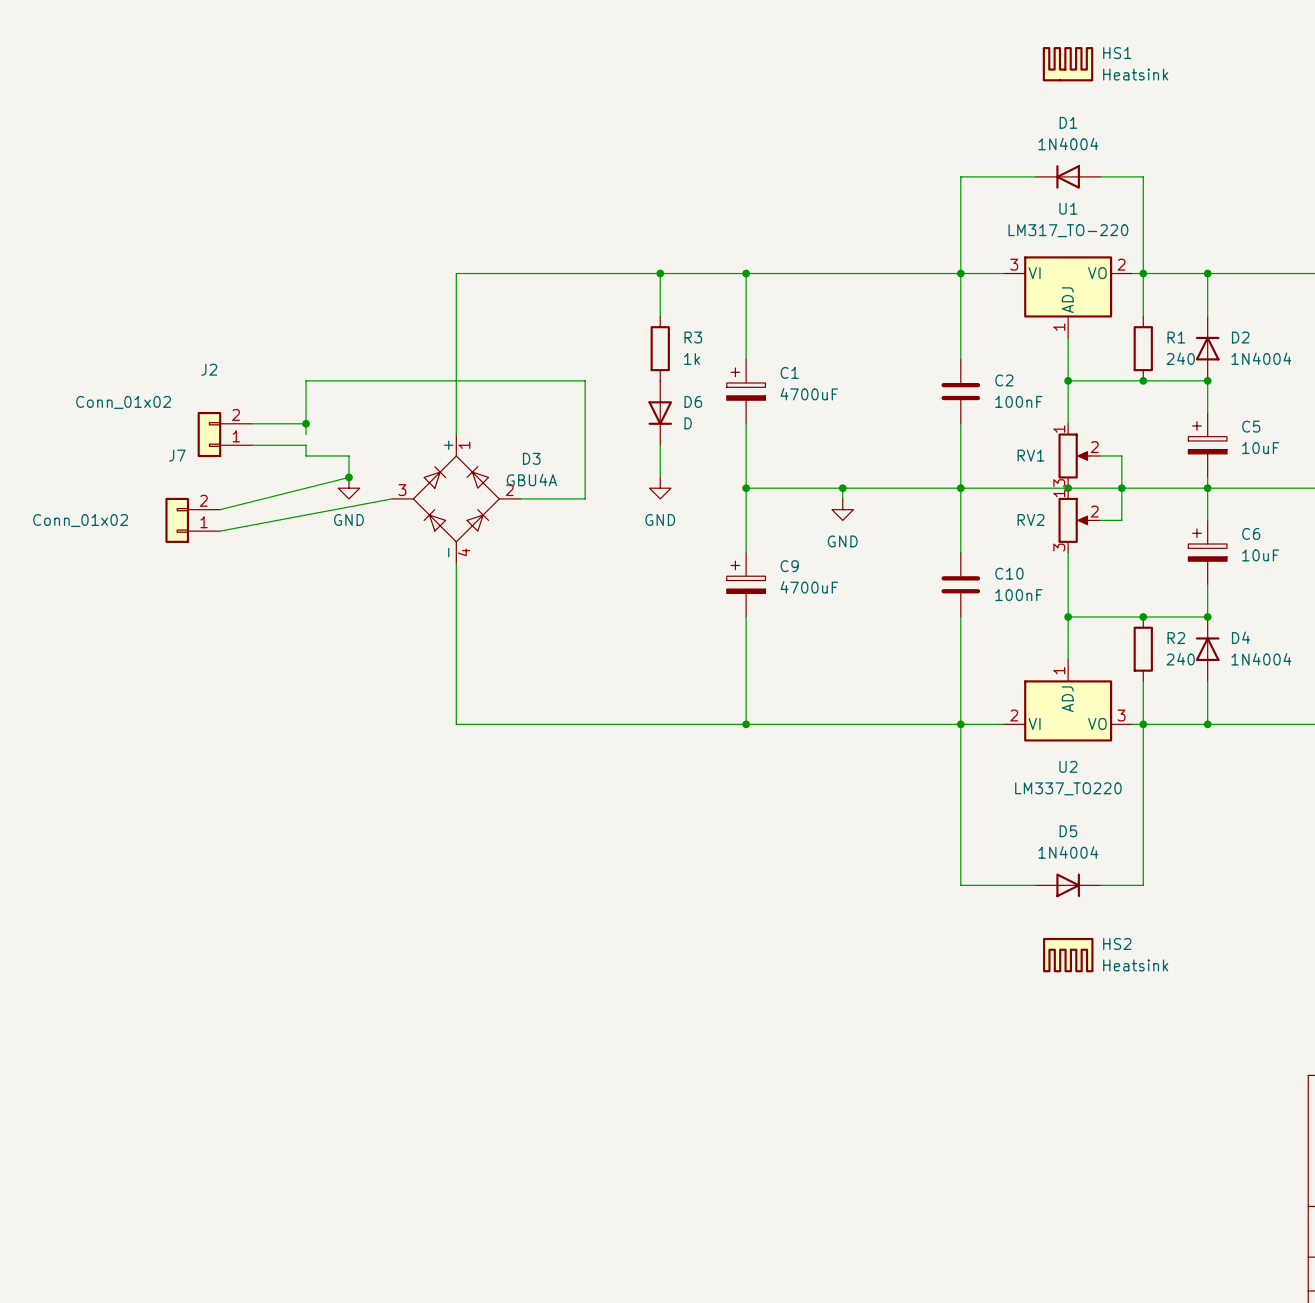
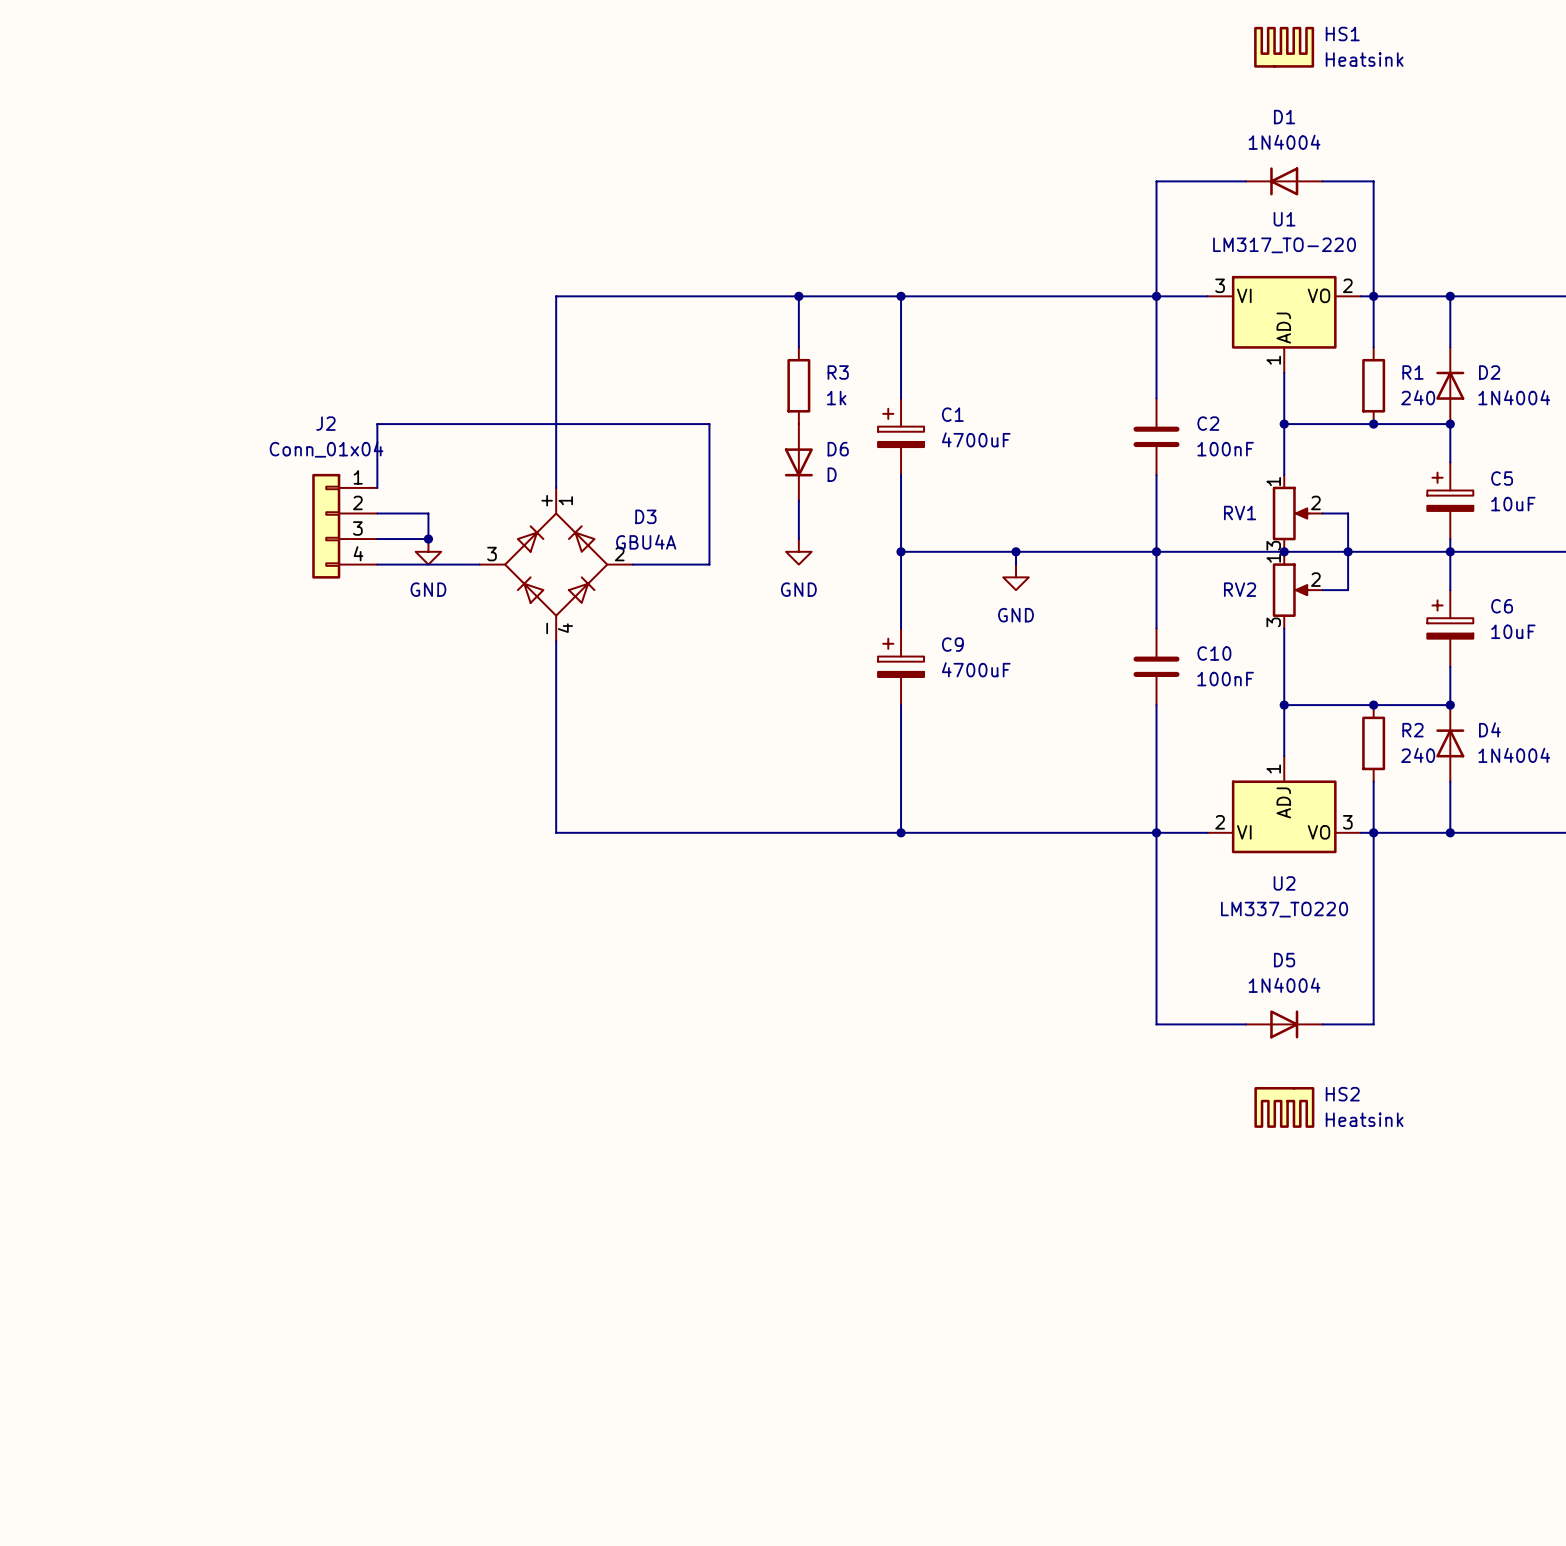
J2 name position: J2 (209, 369) -> J2 (325, 423)
J2 value: Conn_01x02 (123, 402) -> Conn_01x04 (326, 449)
J2 symbol: [197, 411, 253, 458] -> [312, 473, 378, 579]
wire: (252, 423) (306, 423) -> none
junction: (306, 423) -> none
wire: (252, 445) (306, 445) (306, 455) -> none
wire: (348, 477) (220, 509) -> (428, 539) (377, 539)
wire: (391, 498) (220, 531) -> (479, 564) (377, 564)
J7: Conn_01x02 (192, 520) -> none

